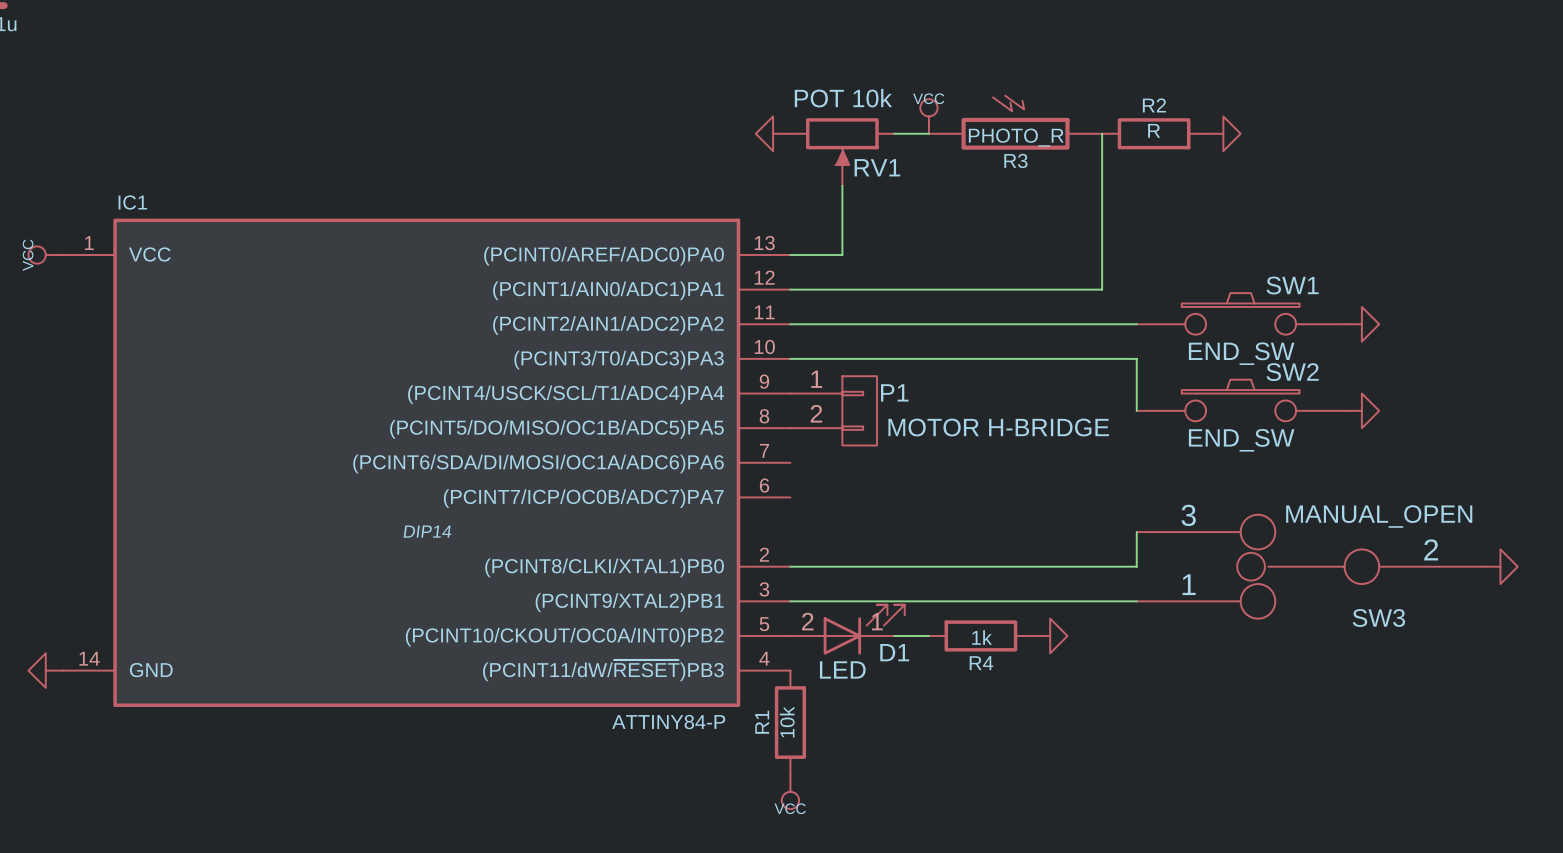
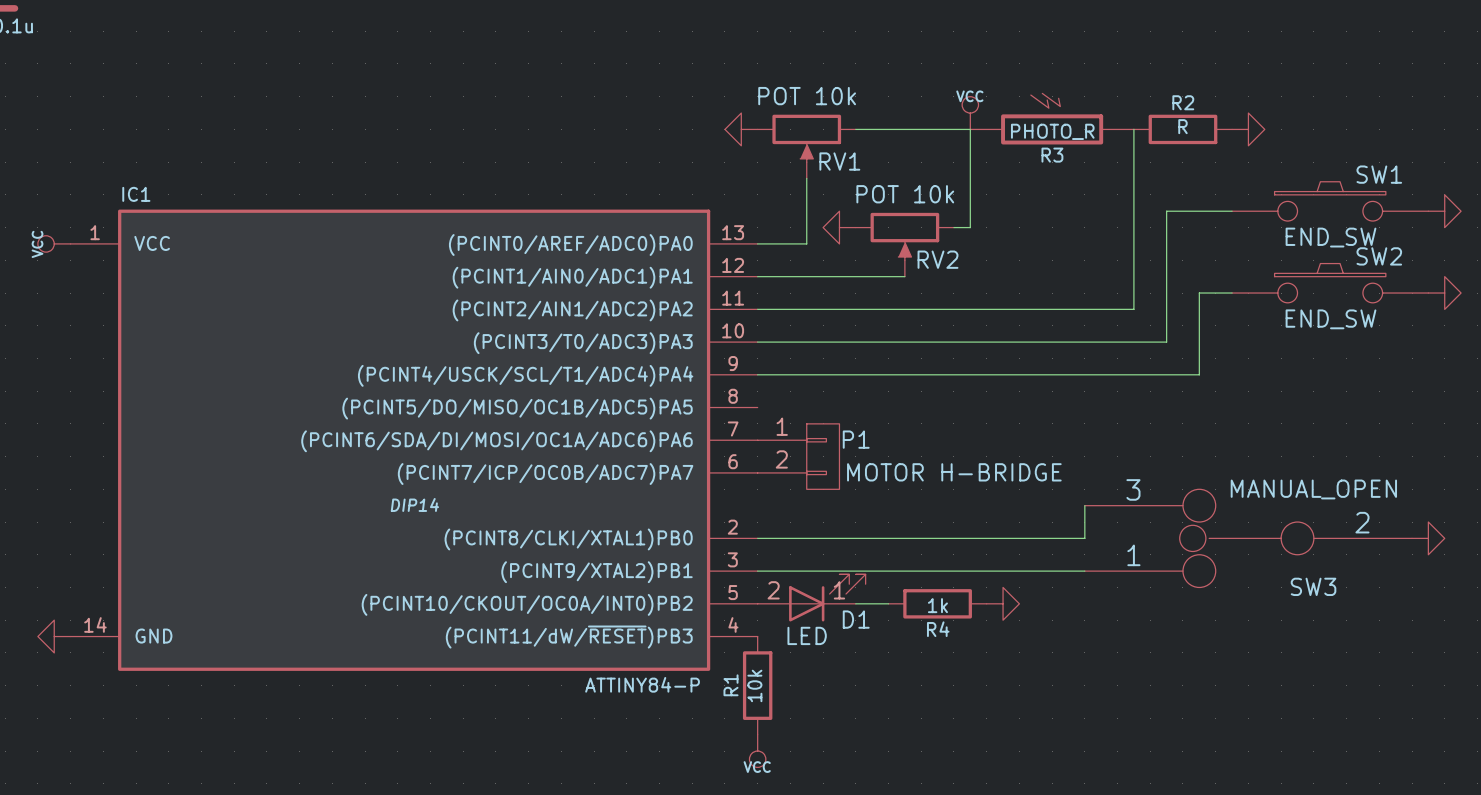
power symbol position: VCC (928, 116) -> VCC (970, 113)
R3 position: (1015, 122) -> (1052, 118)
wire: none -> (888, 129) (970, 129) (970, 227) (953, 227)
wire: (1102, 133) (1102, 289) (946, 289) -> none
R2 position: (1154, 133) -> (1182, 129)
wire: none -> (1133, 129) (1133, 309) (1084, 309)
power symbol position: (1223, 133) -> (1248, 129)
power symbol: none -> (1444, 211)
power symbol: none -> (839, 227)
RV2: none -> POT 10k (904, 244)
wire: none -> (1232, 293) (1199, 293) (1199, 374) (757, 374)
power symbol: none -> (1444, 293)
SW1 position: (1240, 313) -> (1330, 201)
power symbol: (1361, 324) -> none
wire: (1136, 358) (1136, 410) -> (1084, 342) (1166, 342) (1166, 211) (1232, 211)
SW2 position: (1240, 400) -> (1330, 283)
P1 position: (833, 410) -> (798, 456)
power symbol: (1361, 410) -> none

